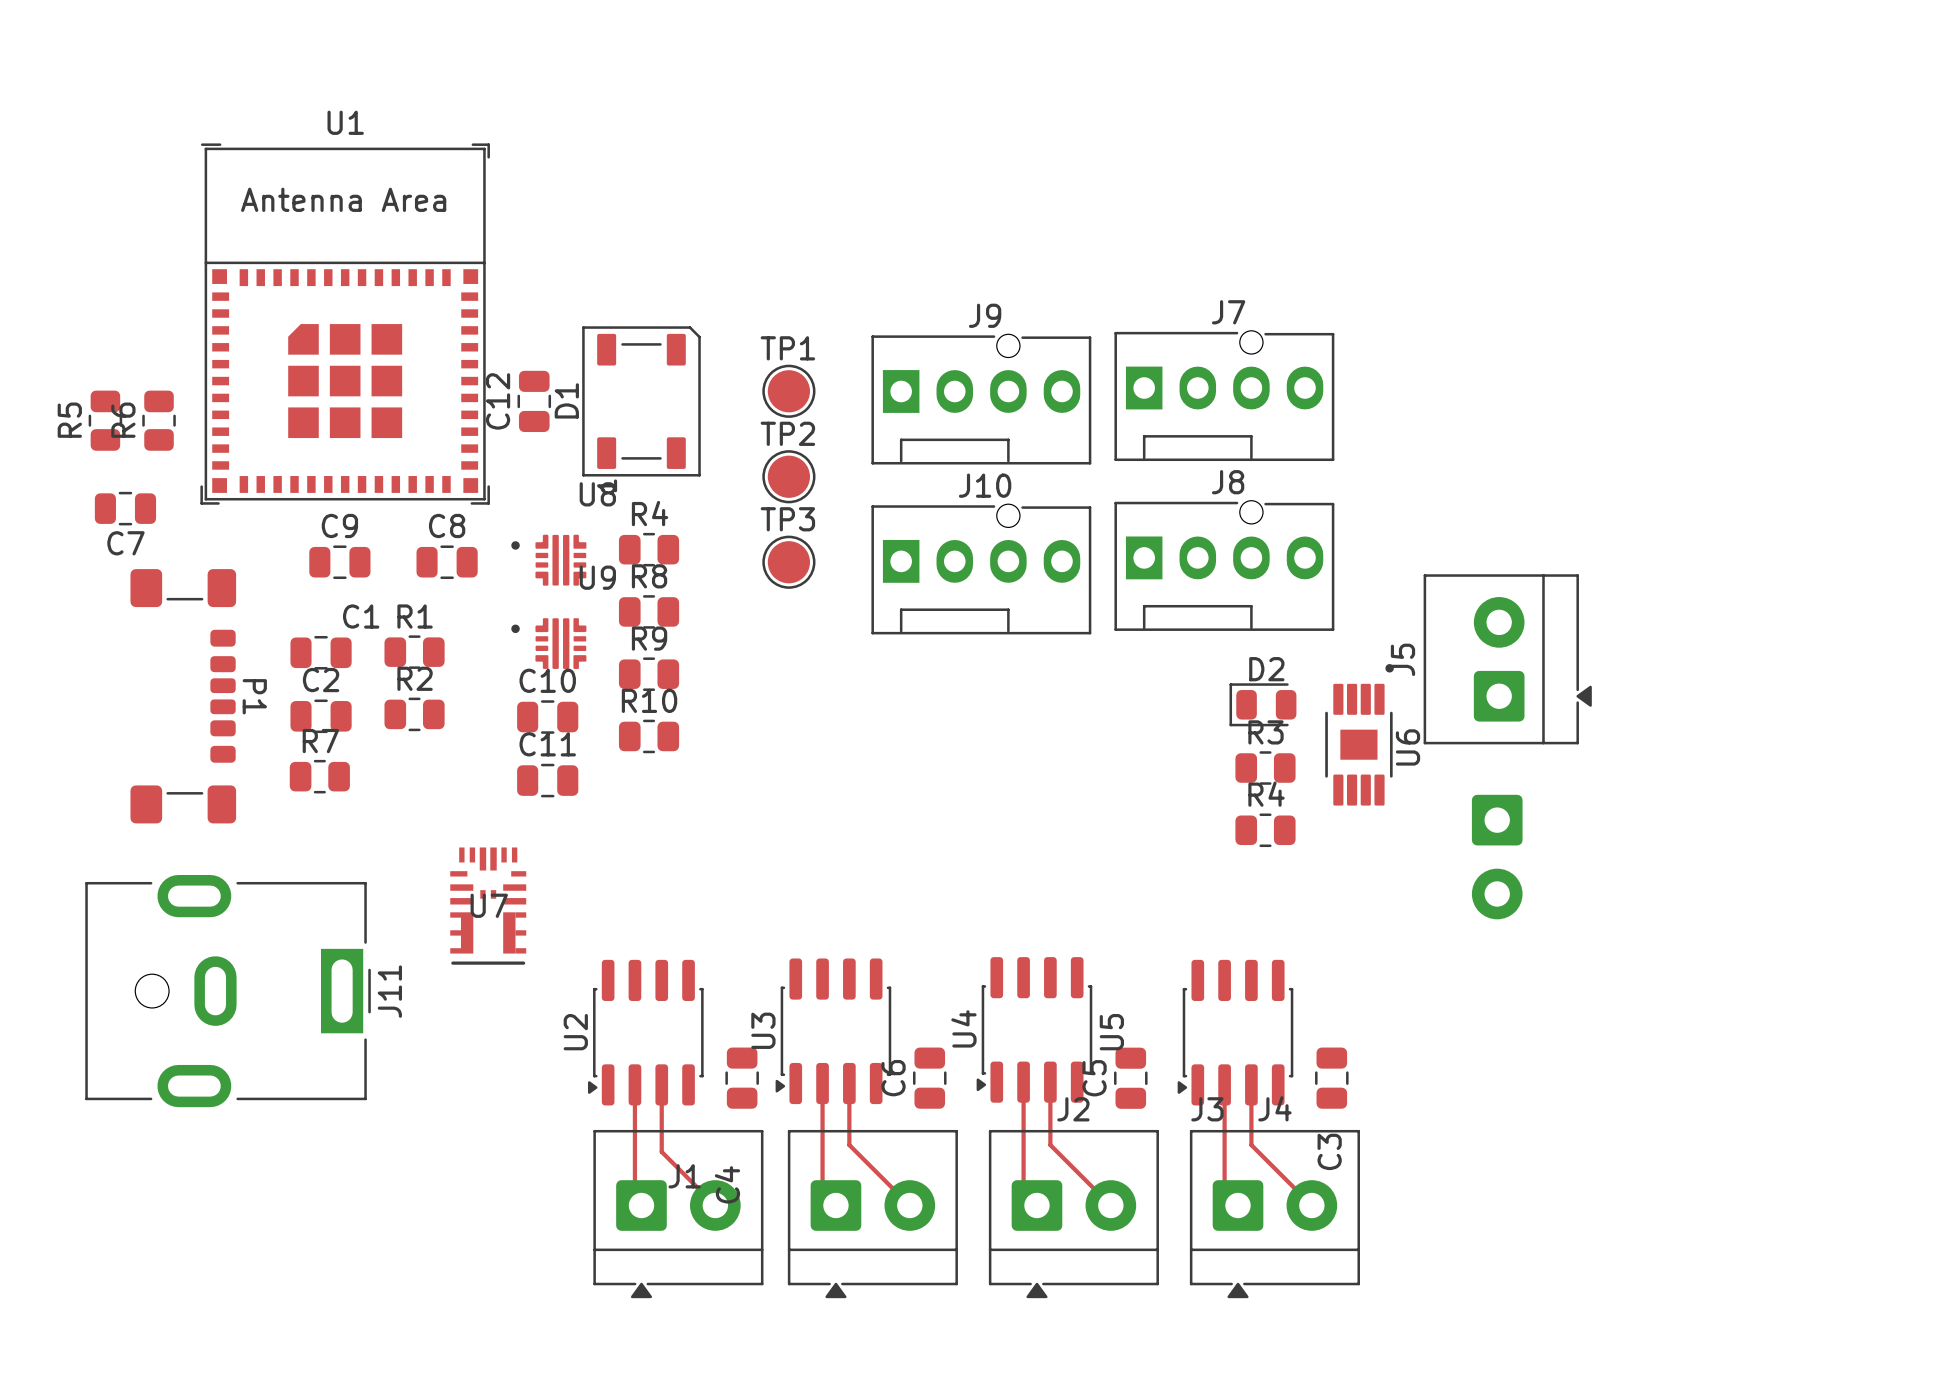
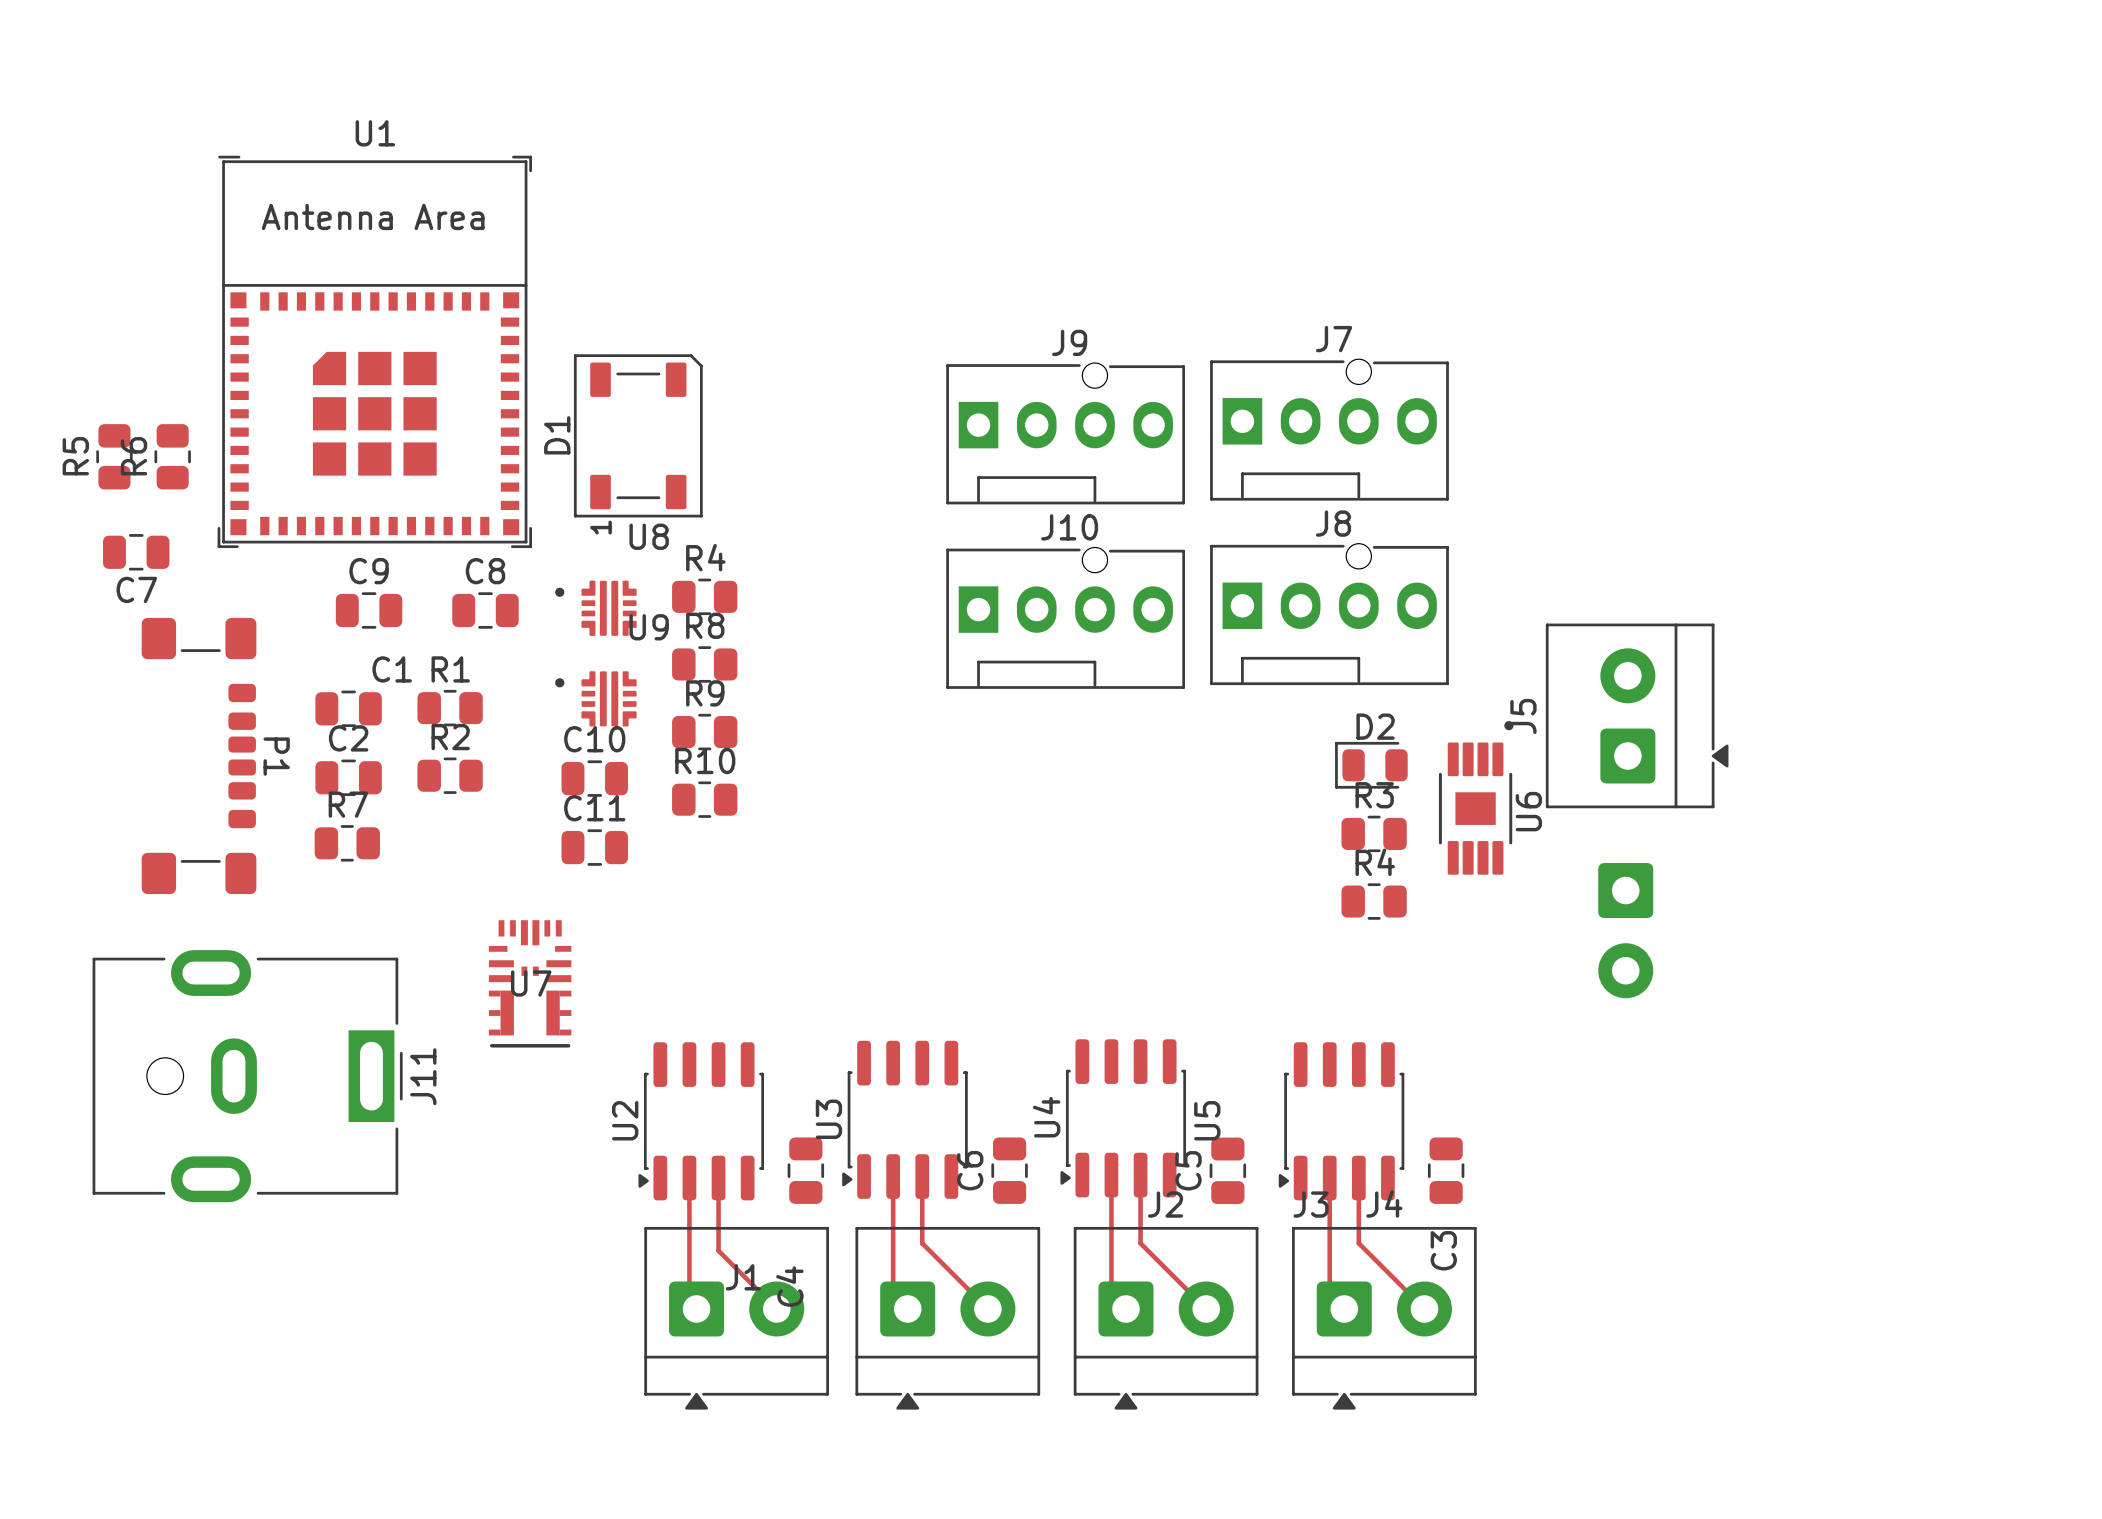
TP1: (788, 391) -> none
C12: (534, 401) -> none
D1 position: (641, 401) -> (638, 435)
TP2: (788, 476) -> none
TP3: (788, 562) -> none

